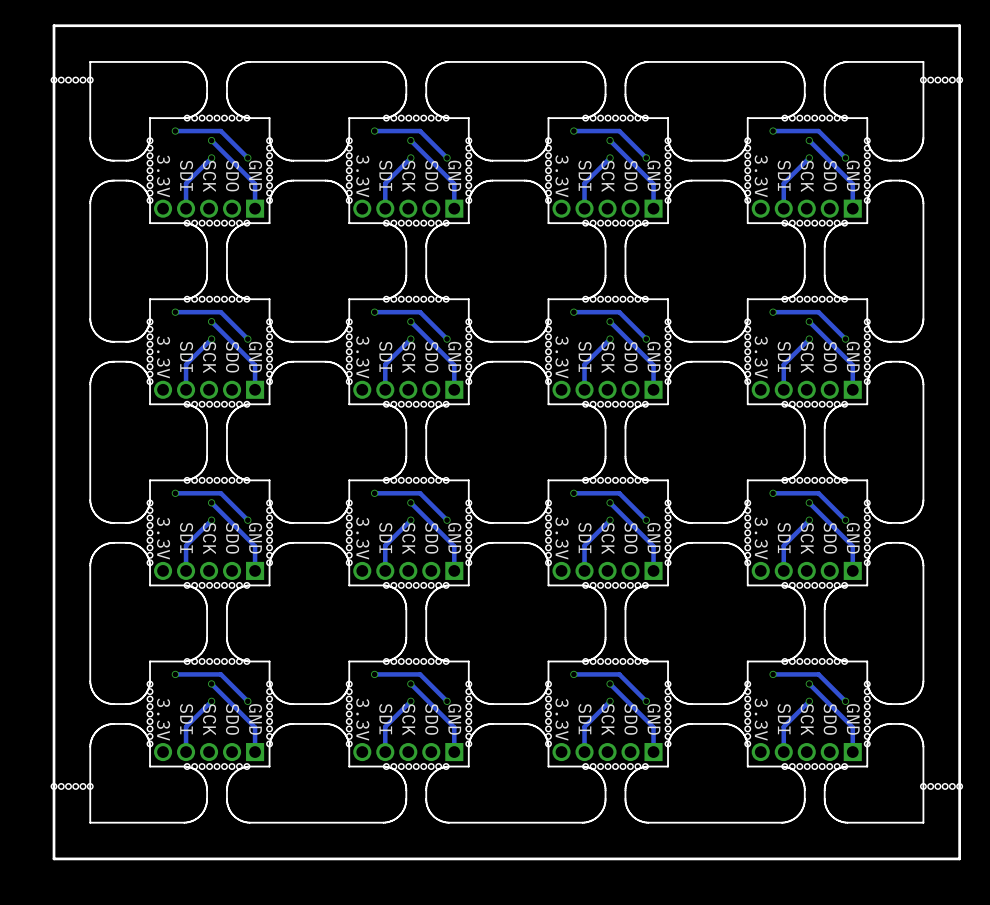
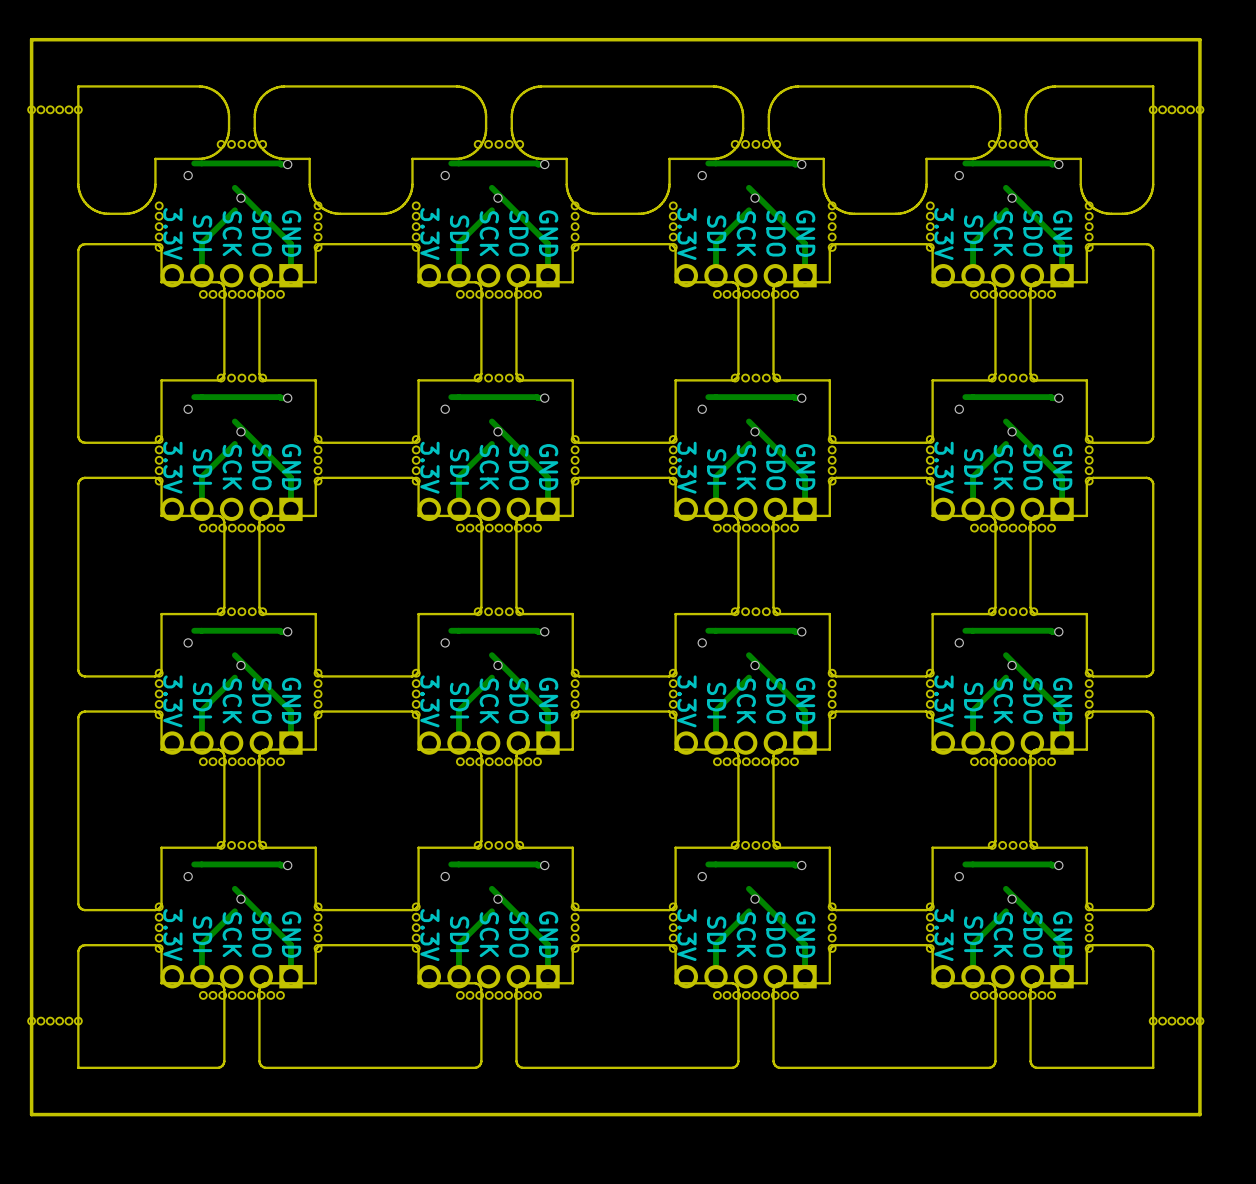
part footprint: [184, 115, 250, 121] -> [217, 140, 267, 148]
part footprint: [383, 115, 449, 121] -> [474, 140, 524, 148]
part footprint: [582, 115, 649, 121] -> [731, 140, 781, 148]
part footprint: [782, 115, 848, 121] -> [988, 140, 1038, 148]
track: none -> (194, 163) (287, 164)
track: none -> (451, 163) (544, 164)
track: none -> (708, 163) (801, 164)
track: none -> (965, 163) (1058, 164)
via: none -> (287, 164)
via: none -> (544, 164)
via: none -> (801, 164)
via: none -> (1058, 164)
track: (175, 131) (220, 131) (247, 157) -> none
track: (374, 131) (420, 131) (447, 157) -> none
track: (573, 131) (619, 131) (646, 157) -> none
track: (773, 131) (818, 131) (845, 157) -> none
part footprint: [147, 138, 153, 204] -> [155, 202, 163, 251]
part footprint: [266, 138, 273, 204] -> [314, 202, 322, 251]
part footprint: [346, 138, 352, 204] -> [412, 202, 420, 251]
part footprint: [466, 138, 472, 204] -> [571, 202, 579, 251]
part footprint: [545, 138, 552, 204] -> [669, 202, 677, 251]
part footprint: [665, 138, 671, 204] -> [828, 202, 836, 251]
part footprint: [745, 138, 751, 204] -> [926, 202, 934, 251]
part footprint: [864, 138, 870, 204] -> [1085, 202, 1093, 251]
via: (211, 140) -> none
via: (410, 140) -> none
via: (610, 140) -> none
via: (809, 140) -> none
via: none -> (240, 198)
via: none -> (498, 198)
via: none -> (755, 198)
via: none -> (1012, 198)
via: (211, 157) -> none
via: (247, 157) -> none
via: (410, 157) -> none
via: (447, 157) -> none
via: (610, 157) -> none
via: (646, 157) -> none
via: (809, 157) -> none
via: (845, 157) -> none
board edge: (327, 180) (337, 183) (346, 192) (349, 201) (349, 223) (387, 223) (400, 231) (406, 245) (405, 280) (399, 291) (390, 297) (349, 299) (347, 326) (343, 333) (336, 339) (327, 341) (287, 341) (278, 336) (271, 327) (269, 299) (244, 298) (236, 294) (230, 287) (227, 277) (227, 241) (232, 231) (240, 225) (269, 223) (270, 197) (274, 189) (281, 183) (291, 180) (327, 180) -> (412, 244) (416, 245) (418, 250) (418, 282) (475, 282) (480, 286) (480, 376) (475, 380) (418, 380) (418, 436) (414, 442) (319, 442) (315, 436) (315, 380) (265, 380) (259, 376) (259, 286) (265, 282) (315, 282) (315, 250) (319, 244) (412, 244)
board edge: (526, 180) (536, 183) (545, 192) (548, 201) (548, 223) (586, 223) (600, 231) (605, 245) (604, 280) (599, 291) (589, 297) (548, 299) (547, 326) (542, 333) (535, 339) (526, 341) (487, 341) (477, 336) (470, 327) (468, 299) (443, 298) (435, 294) (429, 287) (426, 277) (426, 241) (431, 231) (440, 225) (468, 223) (469, 197) (473, 189) (480, 183) (490, 180) (526, 180) -> (669, 244) (673, 245) (675, 250) (675, 282) (732, 282) (737, 286) (737, 376) (732, 380) (675, 380) (675, 436) (671, 442) (576, 442) (572, 436) (572, 380) (522, 380) (517, 376) (517, 286) (522, 282) (572, 282) (572, 250) (576, 244) (669, 244)
board edge: (725, 180) (736, 183) (744, 192) (747, 201) (747, 223) (785, 223) (799, 231) (804, 245) (804, 280) (798, 291) (789, 297) (747, 299) (746, 326) (741, 333) (734, 339) (725, 341) (686, 341) (676, 336) (670, 327) (668, 299) (642, 298) (634, 294) (628, 287) (625, 277) (626, 241) (630, 231) (639, 225) (668, 223) (668, 197) (672, 189) (679, 183) (689, 180) (725, 180) -> (926, 244) (930, 245) (932, 250) (932, 282) (989, 282) (994, 286) (994, 376) (989, 380) (932, 380) (932, 436) (928, 442) (834, 442) (829, 436) (829, 380) (779, 380) (774, 376) (774, 286) (779, 282) (829, 282) (829, 250) (834, 244) (926, 244)
board edge: (90, 203) (94, 191) (103, 182) (113, 180) (135, 182) (144, 188) (148, 196) (150, 223) (184, 223) (193, 225) (203, 234) (207, 246) (207, 277) (202, 289) (196, 295) (188, 298) (150, 299) (149, 324) (145, 332) (138, 338) (128, 341) (105, 340) (94, 331) (90, 319) -> (78, 268) (78, 250) (82, 244) (155, 244) (159, 245) (161, 250) (161, 282) (218, 282) (222, 284) (224, 288) (223, 376) (218, 380) (161, 380) (161, 436) (159, 440) (155, 442) (82, 442) (78, 436) (78, 418)
board edge: (923, 203) (919, 191) (910, 182) (899, 180) (882, 182) (873, 188) (868, 196) (867, 223) (845, 223) (836, 226) (827, 234) (824, 246) (824, 277) (827, 287) (833, 294) (841, 298) (867, 299) (868, 324) (877, 337) (889, 341) (908, 340) (919, 331) (923, 319) -> (1153, 268) (1153, 250) (1149, 244) (1093, 244) (1089, 245) (1086, 250) (1086, 282) (1036, 282) (1032, 284) (1030, 288) (1031, 376) (1036, 380) (1086, 380) (1086, 436) (1089, 440) (1093, 442) (1149, 442) (1153, 436) (1153, 418)
part footprint: [184, 296, 250, 302] -> [217, 374, 267, 382]
part footprint: [383, 296, 449, 302] -> [474, 374, 524, 382]
part footprint: [582, 296, 649, 302] -> [731, 374, 781, 382]
part footprint: [782, 296, 848, 302] -> [988, 374, 1038, 382]
track: none -> (194, 397) (287, 398)
track: none -> (451, 397) (544, 398)
track: none -> (708, 397) (801, 398)
track: none -> (965, 397) (1058, 398)
via: none -> (287, 398)
via: none -> (544, 398)
via: none -> (801, 398)
via: none -> (1058, 398)
track: (175, 312) (220, 312) (247, 339) -> none
track: (374, 312) (420, 312) (447, 339) -> none
track: (573, 312) (619, 312) (646, 339) -> none
track: (773, 312) (818, 312) (845, 339) -> none
part footprint: [147, 319, 153, 385] -> [155, 436, 163, 485]
part footprint: [266, 319, 273, 385] -> [314, 436, 322, 485]
part footprint: [346, 319, 352, 385] -> [412, 436, 420, 485]
part footprint: [466, 319, 472, 385] -> [571, 436, 579, 485]
part footprint: [545, 319, 552, 385] -> [669, 436, 677, 485]
part footprint: [665, 319, 671, 385] -> [828, 436, 836, 485]
part footprint: [745, 319, 751, 385] -> [926, 436, 934, 485]
part footprint: [864, 319, 870, 385] -> [1085, 436, 1093, 485]
via: (211, 321) -> none
via: (410, 321) -> none
via: (610, 321) -> none
via: (809, 321) -> none
via: none -> (240, 431)
via: none -> (498, 431)
via: none -> (755, 431)
via: none -> (1012, 431)
via: (211, 339) -> none
via: (247, 339) -> none
via: (410, 339) -> none
via: (447, 339) -> none
via: (610, 339) -> none
via: (646, 339) -> none
via: (809, 339) -> none
via: (845, 339) -> none
board edge: (327, 361) (337, 364) (346, 373) (349, 382) (349, 404) (387, 404) (400, 412) (406, 426) (405, 462) (399, 473) (390, 478) (349, 480) (347, 507) (343, 515) (336, 520) (327, 522) (287, 522) (278, 517) (271, 509) (269, 480) (244, 479) (236, 475) (230, 468) (227, 458) (227, 422) (232, 412) (240, 406) (269, 404) (270, 379) (274, 370) (281, 364) (291, 361) (327, 361) -> (412, 477) (416, 479) (418, 483) (418, 515) (475, 515) (480, 520) (480, 609) (475, 614) (418, 614) (418, 670) (414, 675) (319, 675) (315, 670) (315, 614) (265, 614) (259, 609) (259, 520) (265, 515) (315, 515) (315, 483) (319, 478) (412, 477)
board edge: (526, 361) (536, 364) (545, 373) (548, 382) (548, 404) (586, 404) (600, 412) (605, 426) (604, 462) (599, 473) (589, 478) (548, 480) (547, 507) (542, 515) (535, 520) (526, 522) (487, 522) (477, 517) (470, 509) (468, 480) (443, 479) (435, 475) (429, 468) (426, 458) (426, 422) (431, 412) (440, 406) (468, 404) (469, 379) (473, 370) (480, 364) (490, 361) (526, 361) -> (669, 477) (673, 479) (675, 483) (675, 515) (732, 515) (737, 520) (737, 609) (732, 614) (675, 614) (675, 670) (671, 675) (576, 675) (572, 670) (572, 614) (522, 614) (517, 609) (517, 520) (522, 515) (572, 515) (572, 483) (576, 478) (669, 477)
board edge: (725, 361) (736, 364) (744, 373) (747, 382) (747, 404) (785, 404) (799, 412) (804, 426) (804, 462) (798, 473) (789, 478) (747, 480) (746, 507) (741, 515) (734, 520) (725, 522) (686, 522) (676, 517) (670, 509) (668, 480) (642, 479) (634, 475) (628, 468) (625, 458) (626, 422) (630, 412) (639, 406) (668, 404) (668, 379) (672, 370) (679, 364) (689, 361) (725, 361) -> (926, 477) (930, 479) (932, 483) (932, 515) (989, 515) (994, 520) (994, 609) (989, 614) (932, 614) (932, 670) (928, 675) (834, 675) (829, 670) (829, 614) (779, 614) (774, 609) (774, 520) (779, 515) (829, 515) (829, 483) (834, 478) (926, 477)
board edge: (90, 384) (94, 372) (103, 364) (113, 361) (135, 363) (144, 369) (148, 377) (150, 404) (184, 404) (193, 406) (203, 415) (207, 427) (207, 458) (202, 470) (196, 476) (188, 479) (150, 480) (149, 505) (145, 513) (138, 519) (128, 522) (105, 521) (94, 512) (90, 500) -> (78, 502) (78, 483) (82, 478) (155, 477) (159, 479) (161, 483) (161, 515) (218, 515) (222, 518) (224, 522) (223, 609) (218, 614) (161, 614) (161, 670) (159, 674) (155, 676) (82, 675) (78, 670) (78, 651)
board edge: (923, 384) (919, 372) (910, 364) (899, 361) (882, 363) (873, 369) (868, 377) (867, 404) (845, 404) (836, 407) (827, 415) (824, 427) (824, 458) (827, 468) (833, 475) (841, 479) (867, 480) (868, 505) (877, 518) (889, 522) (908, 521) (919, 512) (923, 500) -> (1153, 502) (1153, 483) (1149, 478) (1093, 477) (1089, 479) (1086, 483) (1086, 515) (1036, 515) (1032, 518) (1030, 522) (1031, 609) (1036, 614) (1086, 614) (1086, 670) (1089, 674) (1093, 676) (1149, 675) (1153, 670) (1153, 651)
part footprint: [184, 477, 250, 484] -> [217, 608, 267, 616]
part footprint: [383, 477, 449, 484] -> [474, 608, 524, 616]
part footprint: [582, 477, 649, 484] -> [731, 608, 781, 616]
part footprint: [782, 477, 848, 484] -> [988, 608, 1038, 616]
track: none -> (194, 630) (287, 631)
track: none -> (451, 630) (544, 631)
track: none -> (708, 630) (801, 631)
track: none -> (965, 630) (1058, 631)
via: none -> (287, 631)
via: none -> (544, 631)
via: none -> (801, 631)
via: none -> (1058, 631)
track: (175, 493) (220, 493) (247, 520) -> none
track: (374, 493) (420, 493) (447, 520) -> none
track: (573, 493) (619, 493) (646, 520) -> none
track: (773, 493) (818, 493) (845, 520) -> none
part footprint: [147, 500, 153, 566] -> [155, 669, 163, 719]
part footprint: [266, 500, 273, 566] -> [314, 669, 322, 719]
part footprint: [346, 500, 352, 566] -> [412, 669, 420, 719]
part footprint: [466, 500, 472, 566] -> [571, 669, 579, 719]
part footprint: [545, 500, 552, 566] -> [669, 669, 677, 719]
part footprint: [665, 500, 671, 566] -> [828, 669, 836, 719]
part footprint: [745, 500, 751, 566] -> [926, 669, 934, 719]
part footprint: [864, 500, 870, 566] -> [1085, 669, 1093, 719]
via: (211, 502) -> none
via: (410, 502) -> none
via: (610, 502) -> none
via: (809, 502) -> none
via: none -> (240, 665)
via: none -> (498, 665)
via: none -> (755, 665)
via: none -> (1012, 665)
via: (211, 520) -> none
via: (247, 520) -> none
via: (410, 520) -> none
via: (447, 520) -> none
via: (610, 520) -> none
via: (646, 520) -> none
via: (809, 520) -> none
via: (845, 520) -> none
board edge: (327, 542) (337, 546) (346, 555) (349, 563) (349, 585) (387, 585) (400, 594) (406, 607) (405, 643) (399, 654) (390, 660) (349, 661) (347, 688) (343, 696) (336, 701) (327, 703) (287, 703) (278, 698) (271, 690) (269, 661) (244, 660) (236, 656) (230, 649) (227, 639) (227, 603) (232, 594) (240, 587) (269, 585) (270, 560) (274, 552) (281, 546) (291, 542) (327, 542) -> (412, 711) (416, 713) (418, 717) (418, 749) (475, 749) (480, 753) (480, 843) (475, 847) (418, 847) (418, 904) (414, 909) (319, 909) (315, 904) (315, 847) (265, 847) (259, 843) (259, 753) (265, 749) (315, 749) (315, 717) (319, 712) (412, 711)
board edge: (526, 542) (536, 546) (545, 555) (548, 563) (548, 585) (586, 585) (600, 594) (605, 607) (604, 643) (599, 654) (589, 660) (548, 661) (547, 688) (542, 696) (535, 701) (526, 703) (487, 703) (477, 698) (470, 690) (468, 661) (443, 660) (435, 656) (429, 649) (426, 639) (426, 603) (431, 594) (440, 587) (468, 585) (469, 560) (473, 552) (480, 546) (490, 542) (526, 542) -> (669, 711) (673, 713) (675, 717) (675, 749) (732, 749) (737, 753) (737, 843) (732, 847) (675, 847) (675, 904) (671, 909) (576, 909) (572, 904) (572, 847) (522, 847) (517, 843) (517, 753) (522, 749) (572, 749) (572, 717) (576, 712) (669, 711)
board edge: (725, 542) (736, 546) (744, 555) (747, 563) (747, 585) (785, 585) (799, 594) (804, 607) (804, 643) (798, 654) (789, 660) (747, 661) (746, 688) (741, 696) (734, 701) (725, 703) (686, 703) (676, 698) (670, 690) (668, 661) (642, 660) (634, 656) (628, 649) (625, 639) (626, 603) (630, 594) (639, 587) (668, 585) (668, 560) (672, 552) (679, 546) (689, 542) (725, 542) -> (926, 711) (930, 713) (932, 717) (932, 749) (989, 749) (994, 753) (994, 843) (989, 847) (932, 847) (932, 904) (928, 909) (834, 909) (829, 904) (829, 847) (779, 847) (774, 843) (774, 753) (779, 749) (829, 749) (829, 717) (834, 712) (926, 711)
board edge: (90, 565) (94, 553) (103, 545) (113, 542) (135, 544) (144, 550) (148, 558) (150, 585) (184, 585) (193, 587) (203, 597) (207, 609) (207, 639) (202, 651) (196, 657) (188, 661) (150, 661) (149, 686) (145, 694) (138, 700) (128, 703) (105, 702) (94, 693) (90, 681) -> (78, 736) (78, 717) (82, 712) (155, 711) (159, 713) (161, 717) (161, 749) (218, 749) (222, 751) (224, 756) (223, 843) (218, 847) (161, 847) (161, 904) (159, 908) (155, 910) (82, 909) (78, 904) (78, 885)
board edge: (923, 565) (919, 553) (910, 545) (899, 542) (882, 544) (873, 550) (868, 558) (867, 585) (845, 585) (836, 588) (827, 597) (824, 609) (824, 639) (827, 649) (833, 656) (841, 660) (867, 661) (868, 686) (877, 699) (889, 703) (908, 702) (919, 693) (923, 681) -> (1153, 736) (1153, 717) (1149, 712) (1093, 711) (1089, 713) (1086, 717) (1086, 749) (1036, 749) (1032, 751) (1030, 756) (1031, 843) (1036, 847) (1086, 847) (1086, 904) (1089, 908) (1093, 910) (1149, 909) (1153, 904) (1153, 885)
part footprint: [184, 658, 250, 665] -> [217, 841, 267, 849]
part footprint: [383, 658, 449, 665] -> [474, 841, 524, 849]
part footprint: [582, 658, 649, 665] -> [731, 841, 781, 849]
part footprint: [782, 658, 848, 665] -> [988, 841, 1038, 849]
track: none -> (194, 864) (287, 865)
via: none -> (287, 865)
track: none -> (451, 864) (544, 865)
via: none -> (544, 865)
track: none -> (708, 864) (801, 865)
via: none -> (801, 865)
track: none -> (965, 864) (1058, 865)
via: none -> (1058, 865)
track: (175, 674) (220, 674) (247, 701) -> none
track: (374, 674) (420, 674) (447, 701) -> none
track: (573, 674) (619, 674) (646, 701) -> none
track: (773, 674) (818, 674) (845, 701) -> none
part footprint: [147, 681, 153, 747] -> [155, 903, 163, 952]
part footprint: [266, 681, 273, 747] -> [314, 903, 322, 952]
part footprint: [346, 681, 352, 747] -> [412, 903, 420, 952]
part footprint: [466, 681, 472, 747] -> [571, 903, 579, 952]
part footprint: [545, 681, 552, 747] -> [669, 903, 677, 952]
part footprint: [665, 681, 671, 747] -> [828, 903, 836, 952]
part footprint: [745, 681, 751, 747] -> [926, 903, 934, 952]
part footprint: [864, 681, 870, 747] -> [1085, 903, 1093, 952]
via: (211, 683) -> none
via: (410, 683) -> none
via: (610, 683) -> none
via: (809, 683) -> none
via: none -> (240, 899)
via: none -> (498, 899)
via: none -> (755, 899)
via: none -> (1012, 899)
via: (211, 701) -> none
via: (247, 701) -> none
via: (410, 701) -> none
via: (447, 701) -> none
via: (610, 701) -> none
via: (646, 701) -> none
via: (809, 701) -> none
via: (845, 701) -> none
board edge: (90, 746) (94, 734) (103, 726) (112, 724) (131, 724) (141, 729) (147, 737) (150, 766) (186, 766) (197, 771) (206, 784) (206, 804) (197, 817) (184, 822) -> (78, 969) (78, 951) (82, 945) (155, 945) (159, 946) (161, 951) (161, 983) (218, 983) (222, 985) (224, 989) (223, 1063) (218, 1067) (199, 1067)
board edge: (923, 746) (920, 736) (911, 727) (901, 724) (883, 725) (874, 730) (868, 739) (867, 766) (843, 766) (831, 773) (824, 786) (825, 806) (833, 817) (847, 822) -> (1153, 969) (1153, 951) (1149, 945) (1093, 945) (1089, 946) (1086, 951) (1086, 983) (1036, 983) (1032, 985) (1030, 989) (1031, 1063) (1036, 1067) (1055, 1067)
board edge: (383, 822) (395, 818) (404, 807) (406, 788) (403, 778) (395, 770) (387, 766) (349, 766) (349, 744) (346, 736) (337, 727) (325, 723) (291, 724) (281, 727) (274, 733) (270, 741) (269, 766) (246, 766) (232, 775) (227, 786) (228, 807) (237, 818) (249, 822) -> (456, 1067) (475, 1067) (480, 1063) (480, 987) (475, 983) (418, 983) (418, 951) (416, 946) (412, 945) (319, 945) (315, 951) (315, 983) (265, 983) (261, 985) (259, 989) (259, 1063) (265, 1067) (283, 1067)
board edge: (582, 822) (594, 818) (603, 807) (605, 788) (602, 778) (594, 770) (586, 766) (548, 766) (548, 744) (545, 736) (536, 727) (524, 723) (490, 724) (480, 727) (473, 733) (469, 741) (468, 766) (445, 766) (431, 775) (426, 786) (427, 807) (436, 818) (448, 822) -> (713, 1067) (732, 1067) (737, 1063) (737, 987) (732, 983) (675, 983) (675, 951) (673, 946) (669, 945) (576, 945) (572, 951) (572, 983) (522, 983) (518, 985) (516, 989) (517, 1063) (522, 1067) (541, 1067)
board edge: (782, 822) (794, 818) (803, 807) (804, 788) (801, 778) (794, 770) (785, 766) (747, 766) (747, 744) (744, 736) (736, 727) (724, 723) (689, 724) (679, 727) (672, 733) (668, 741) (668, 766) (644, 766) (630, 775) (625, 786) (627, 807) (636, 818) (648, 822) -> (970, 1067) (989, 1067) (994, 1063) (994, 987) (989, 983) (932, 983) (932, 951) (930, 946) (926, 945) (834, 945) (829, 951) (829, 983) (779, 983) (775, 985) (773, 989) (774, 1063) (779, 1067) (798, 1067)

